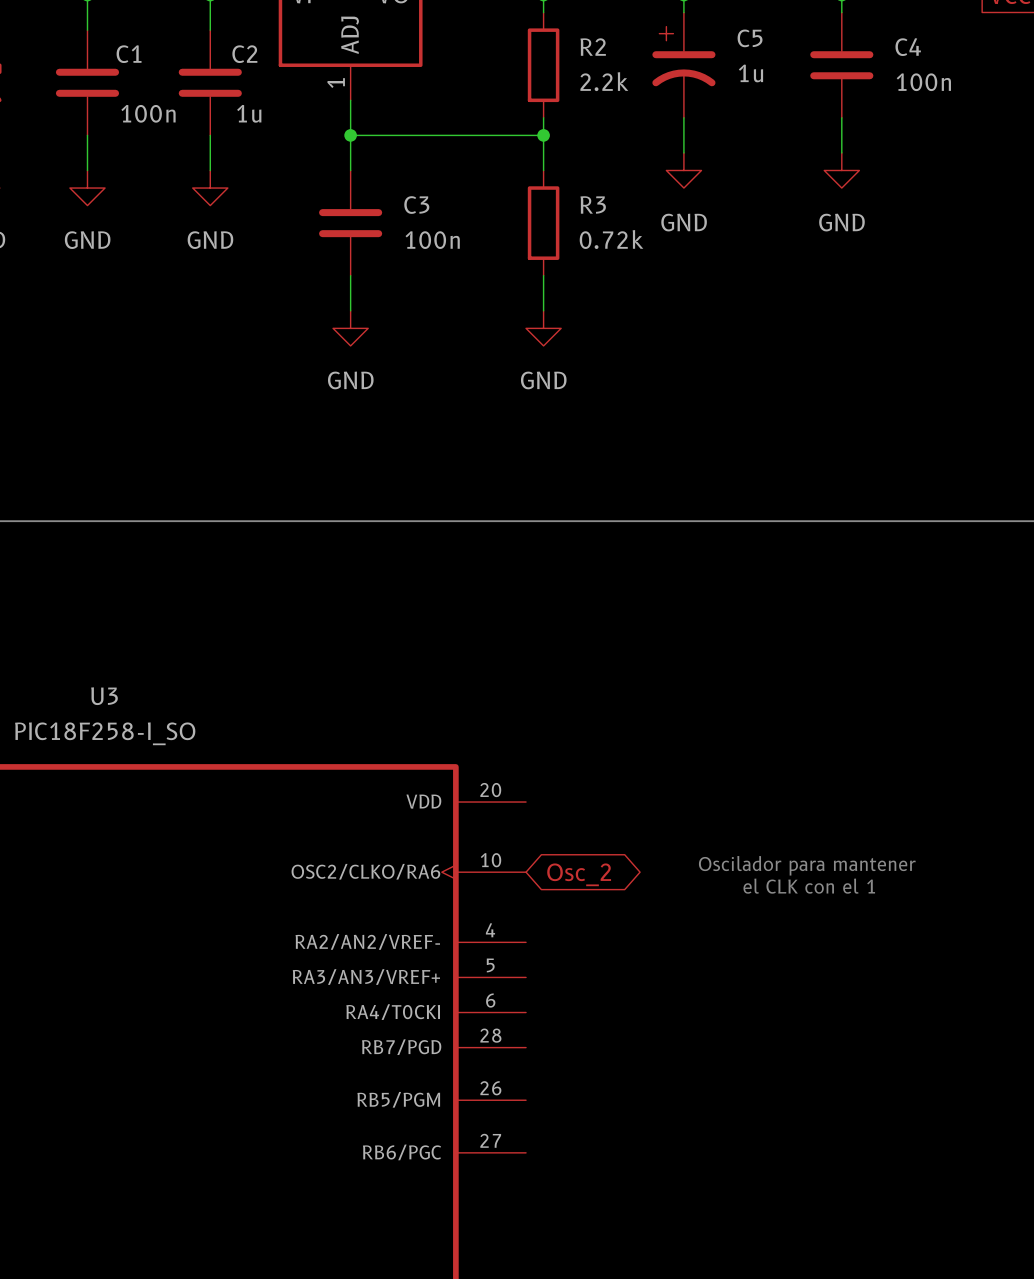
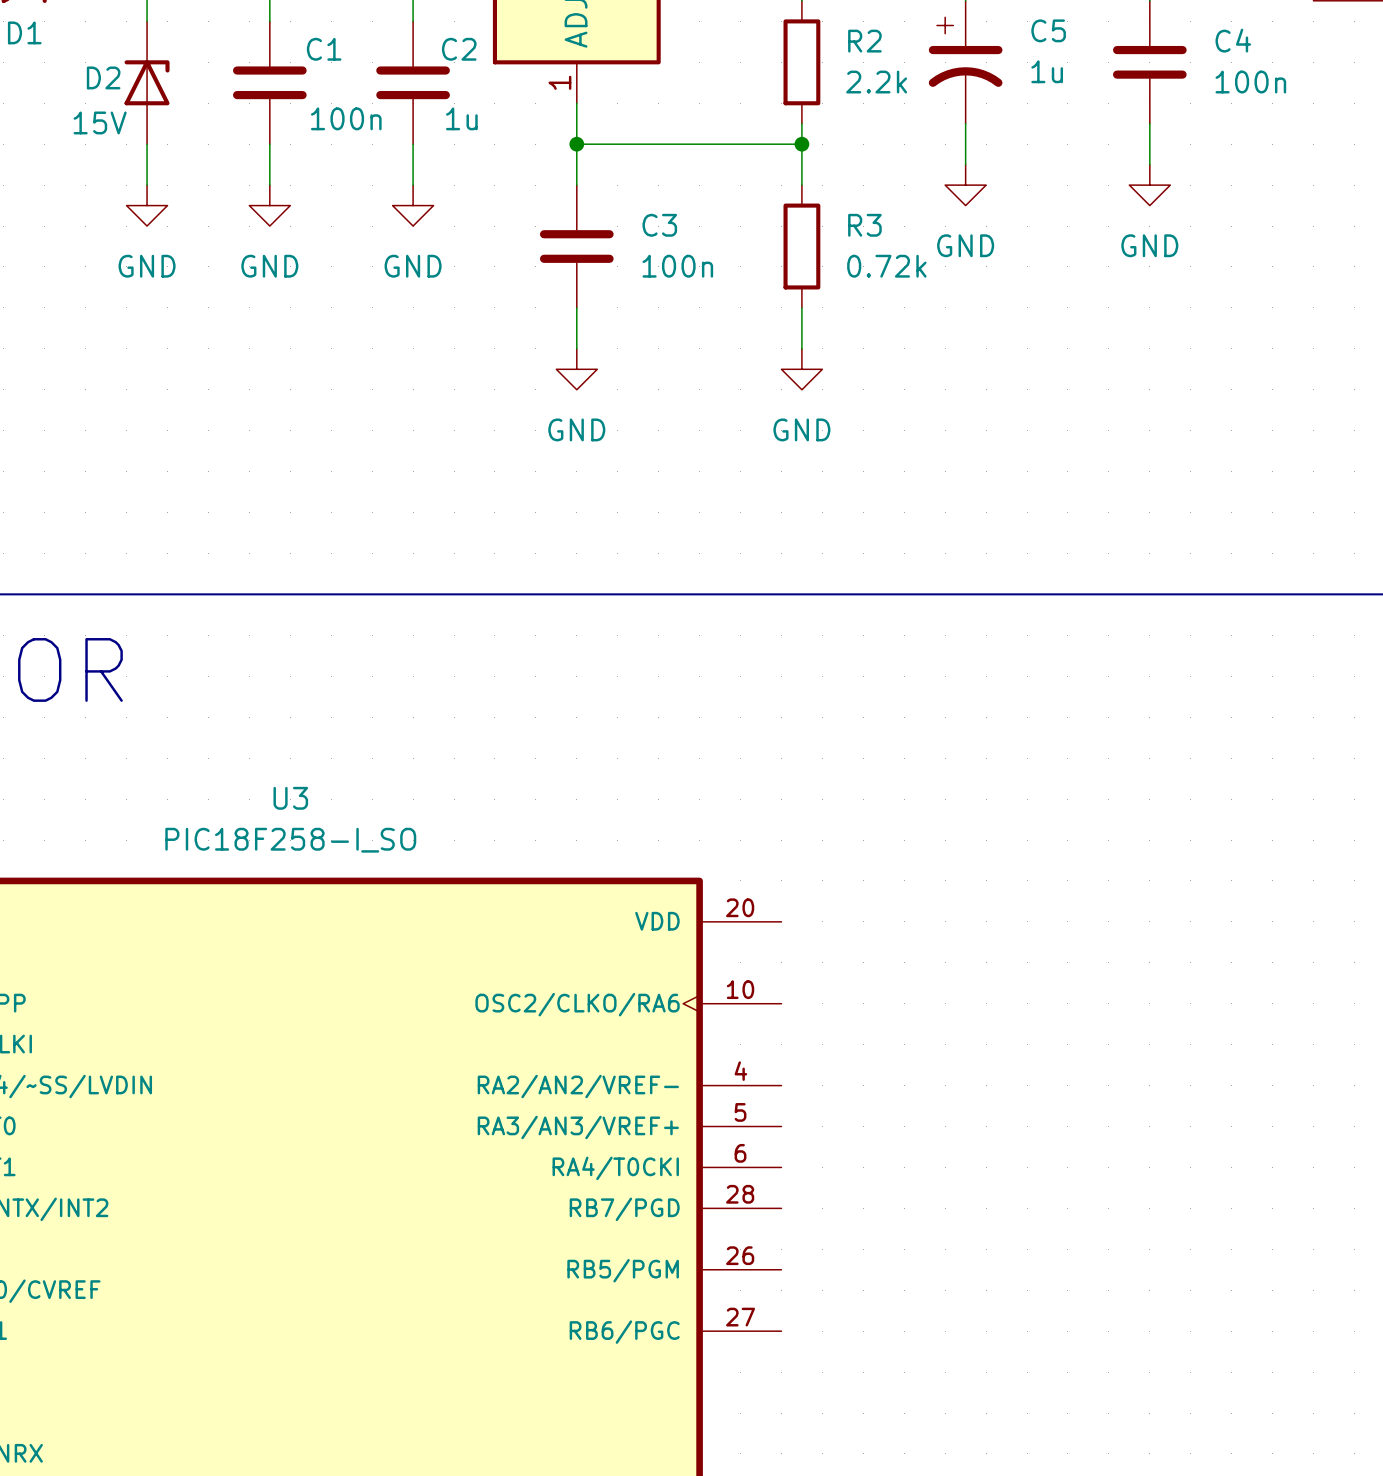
text: Oscilador para mantener (807, 865) -> none
global label: Osc_2 (579, 874) -> none
text: el CLK con el 1 (809, 886) -> none

